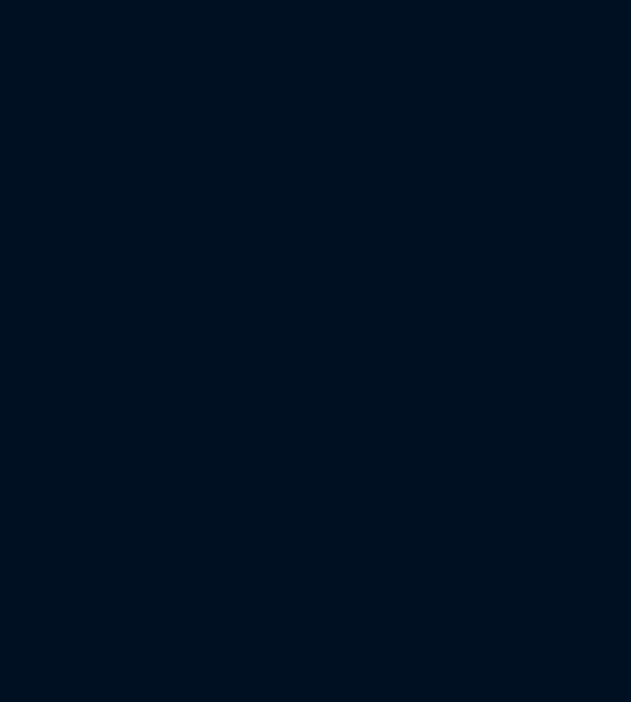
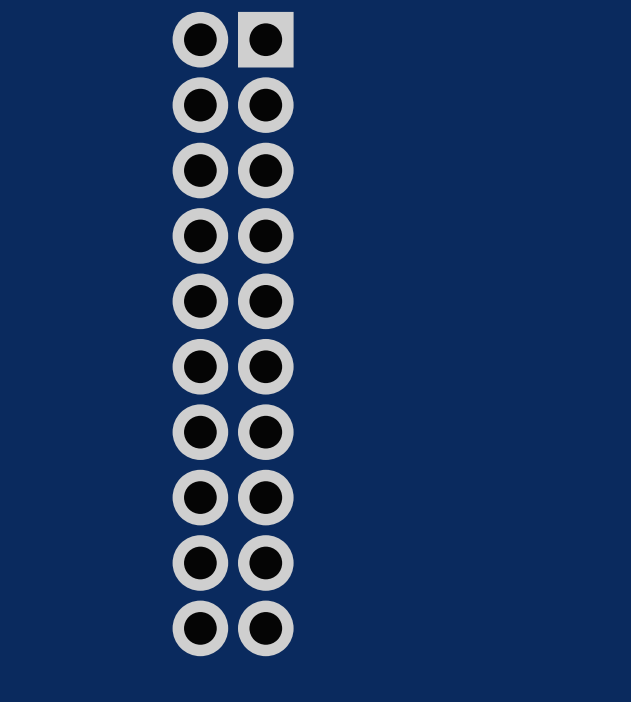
part: none -> (233, 334)

